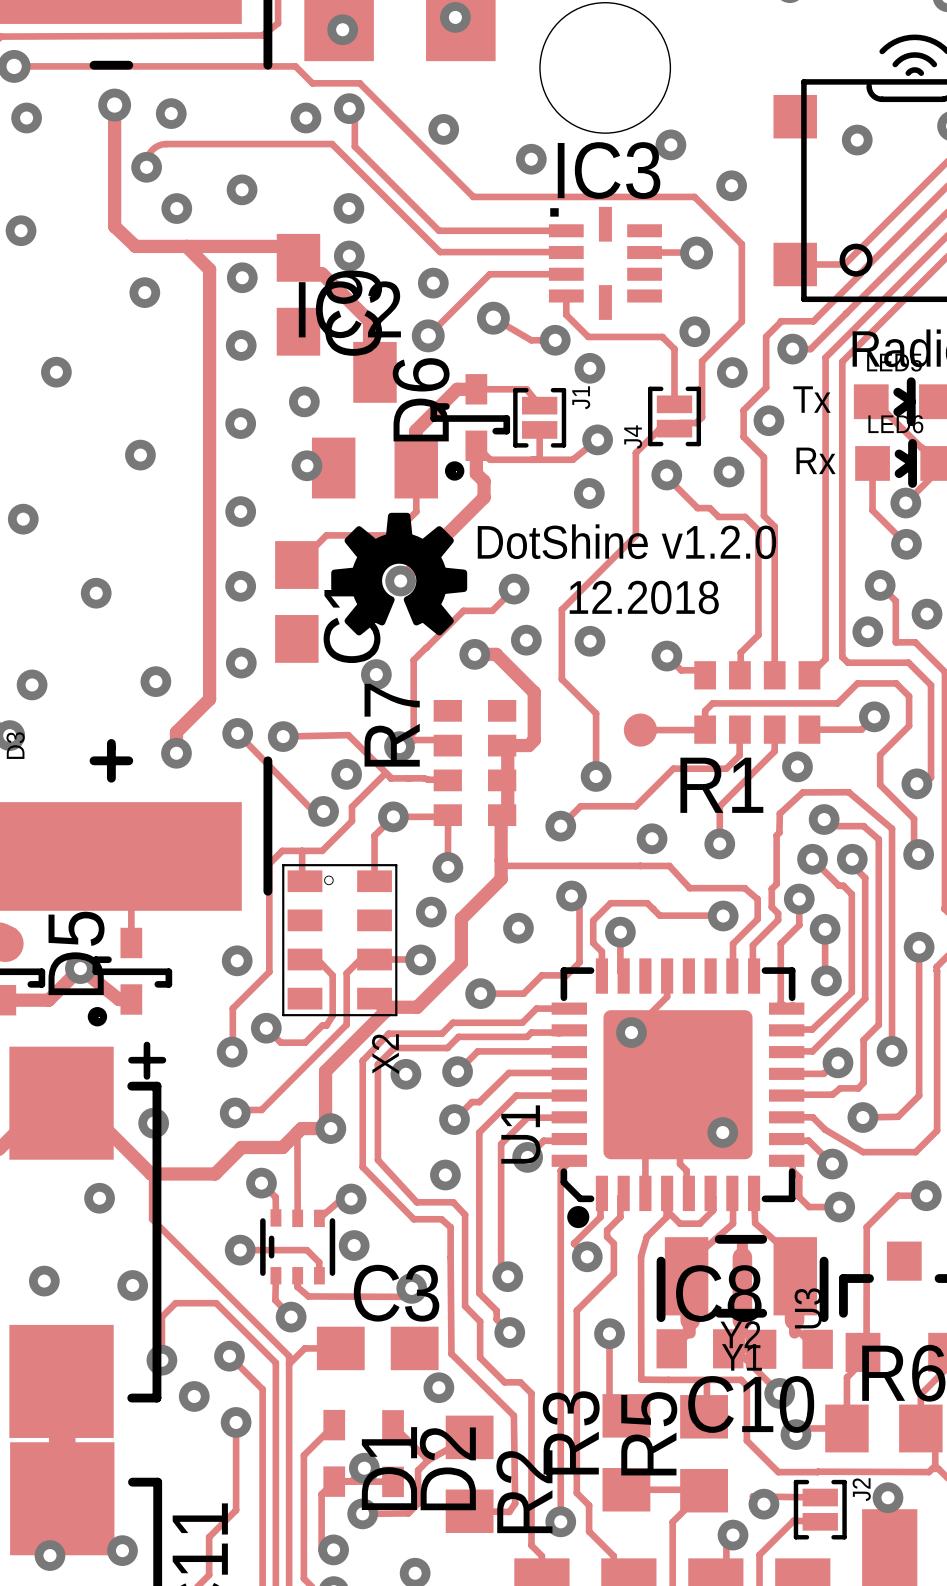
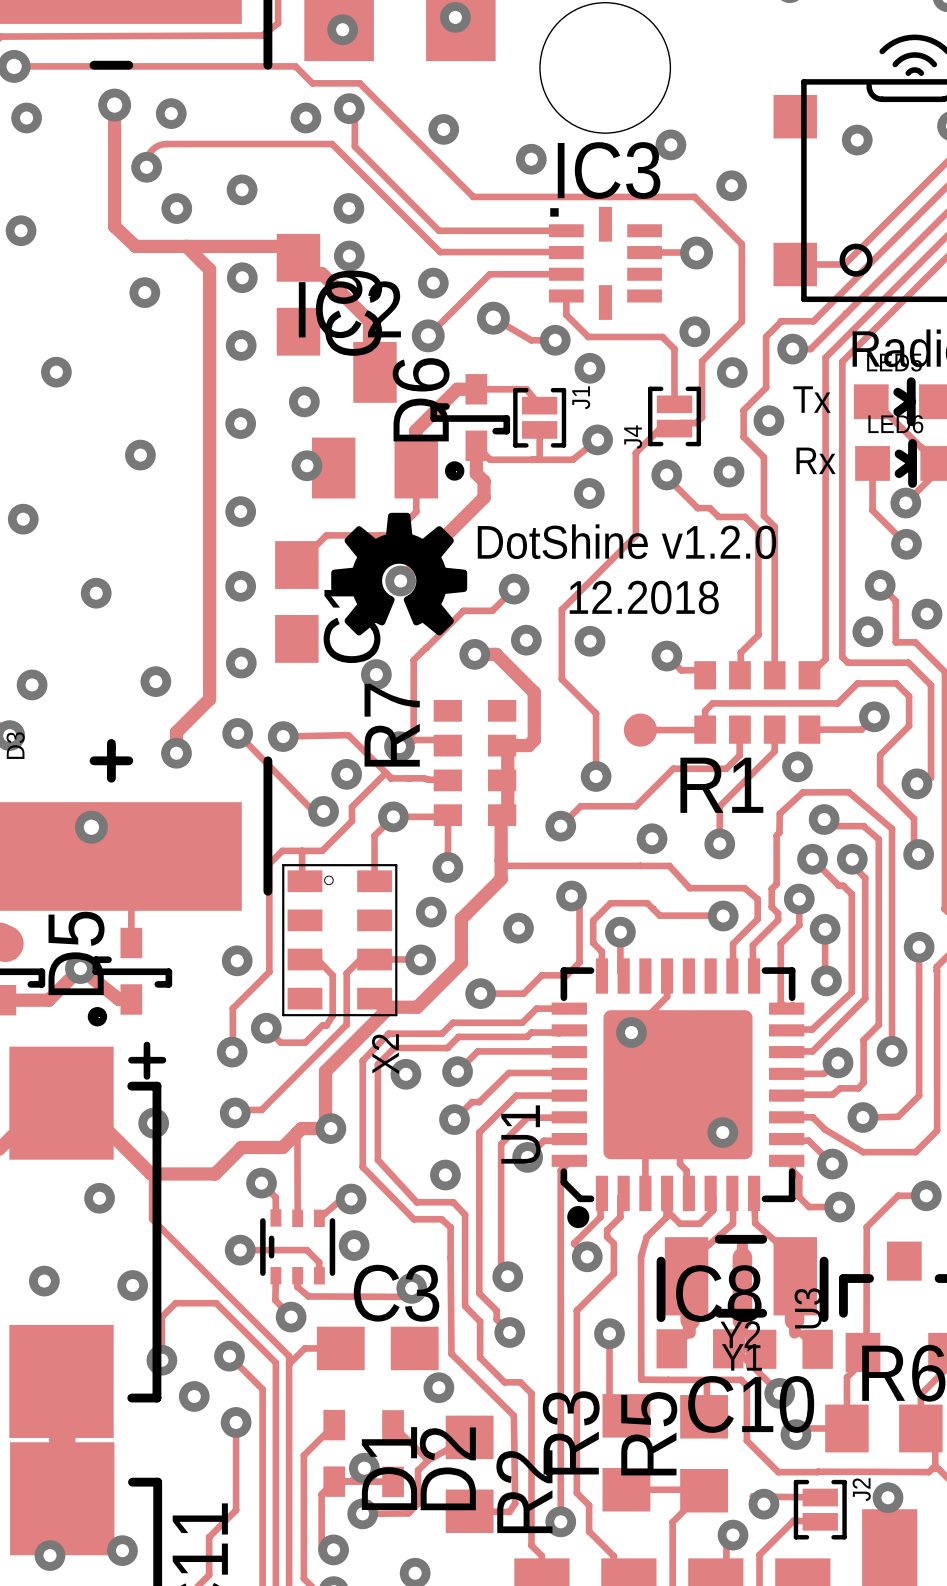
via: none -> (91, 827)

